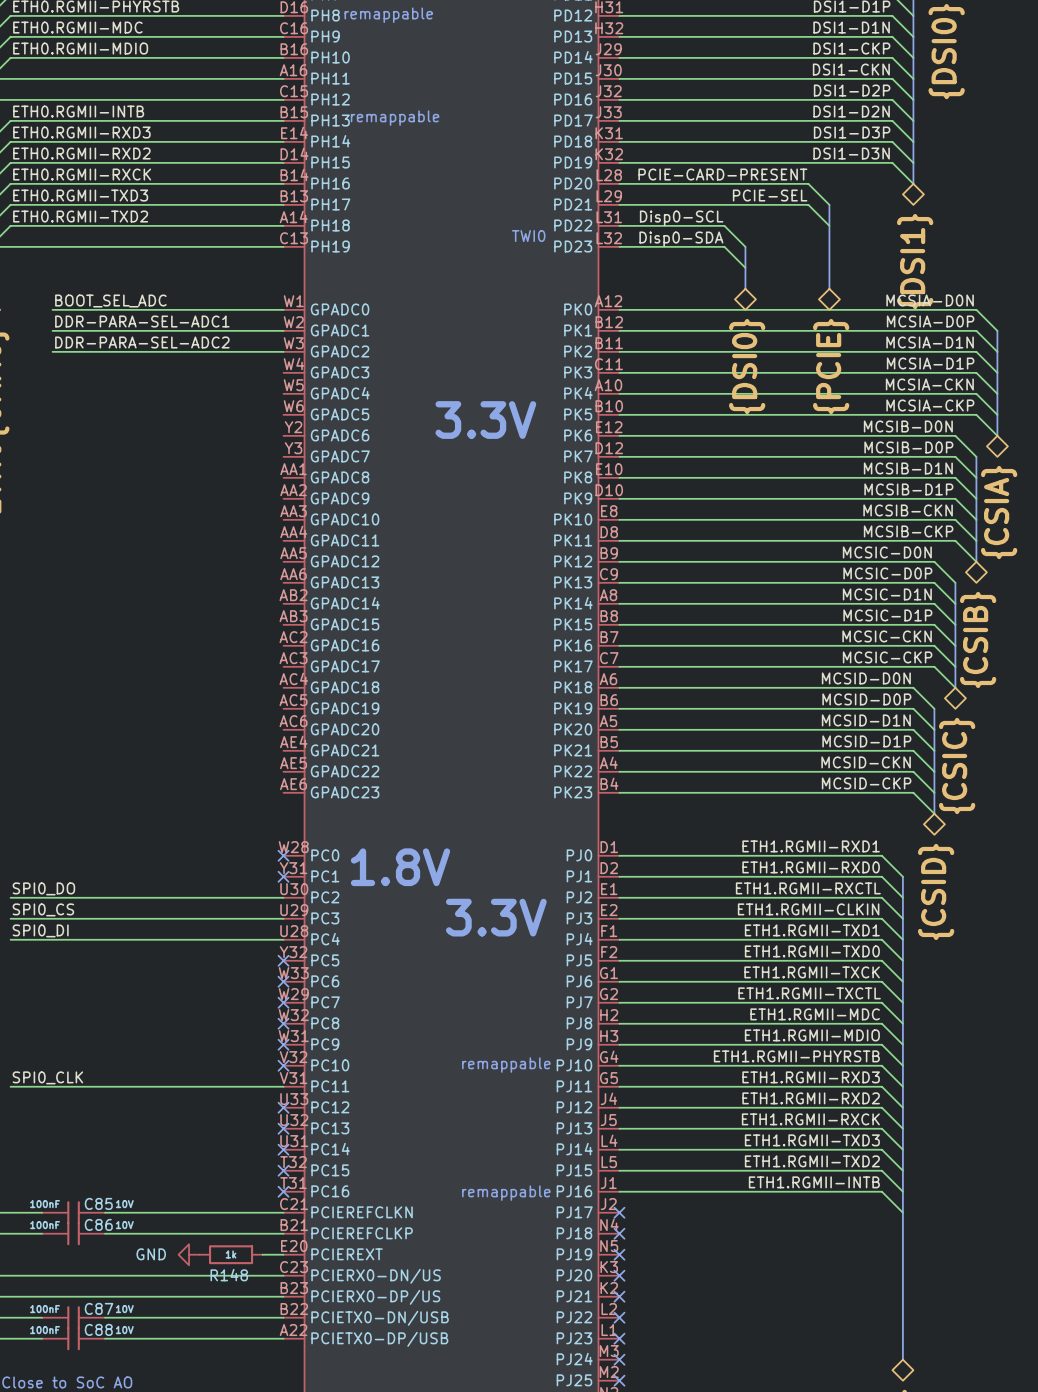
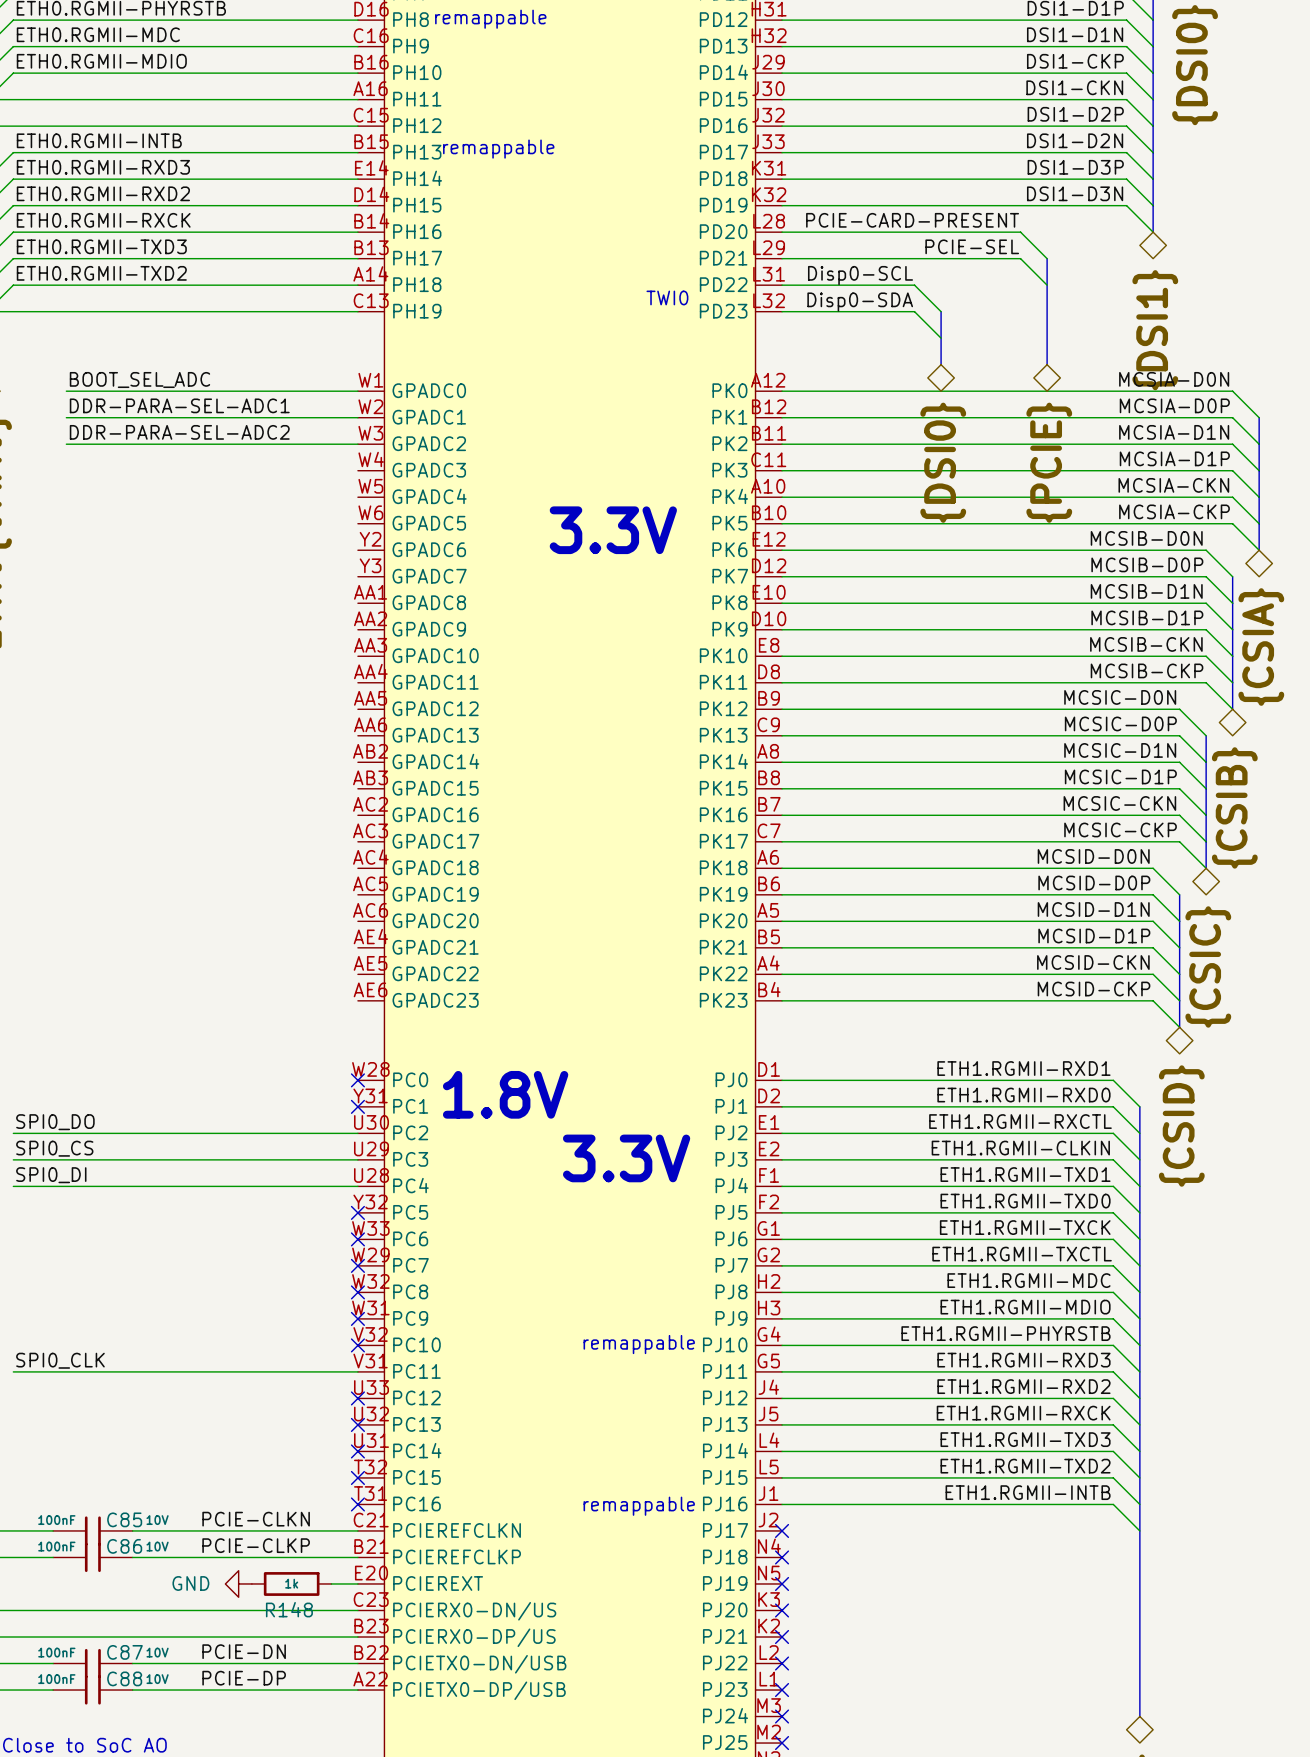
label: none -> PCIE-CLKN (256, 1519)
label: none -> PCIE-CLKP (256, 1545)
label: none -> PCIE-DN (244, 1651)
label: none -> PCIE-DP (244, 1678)

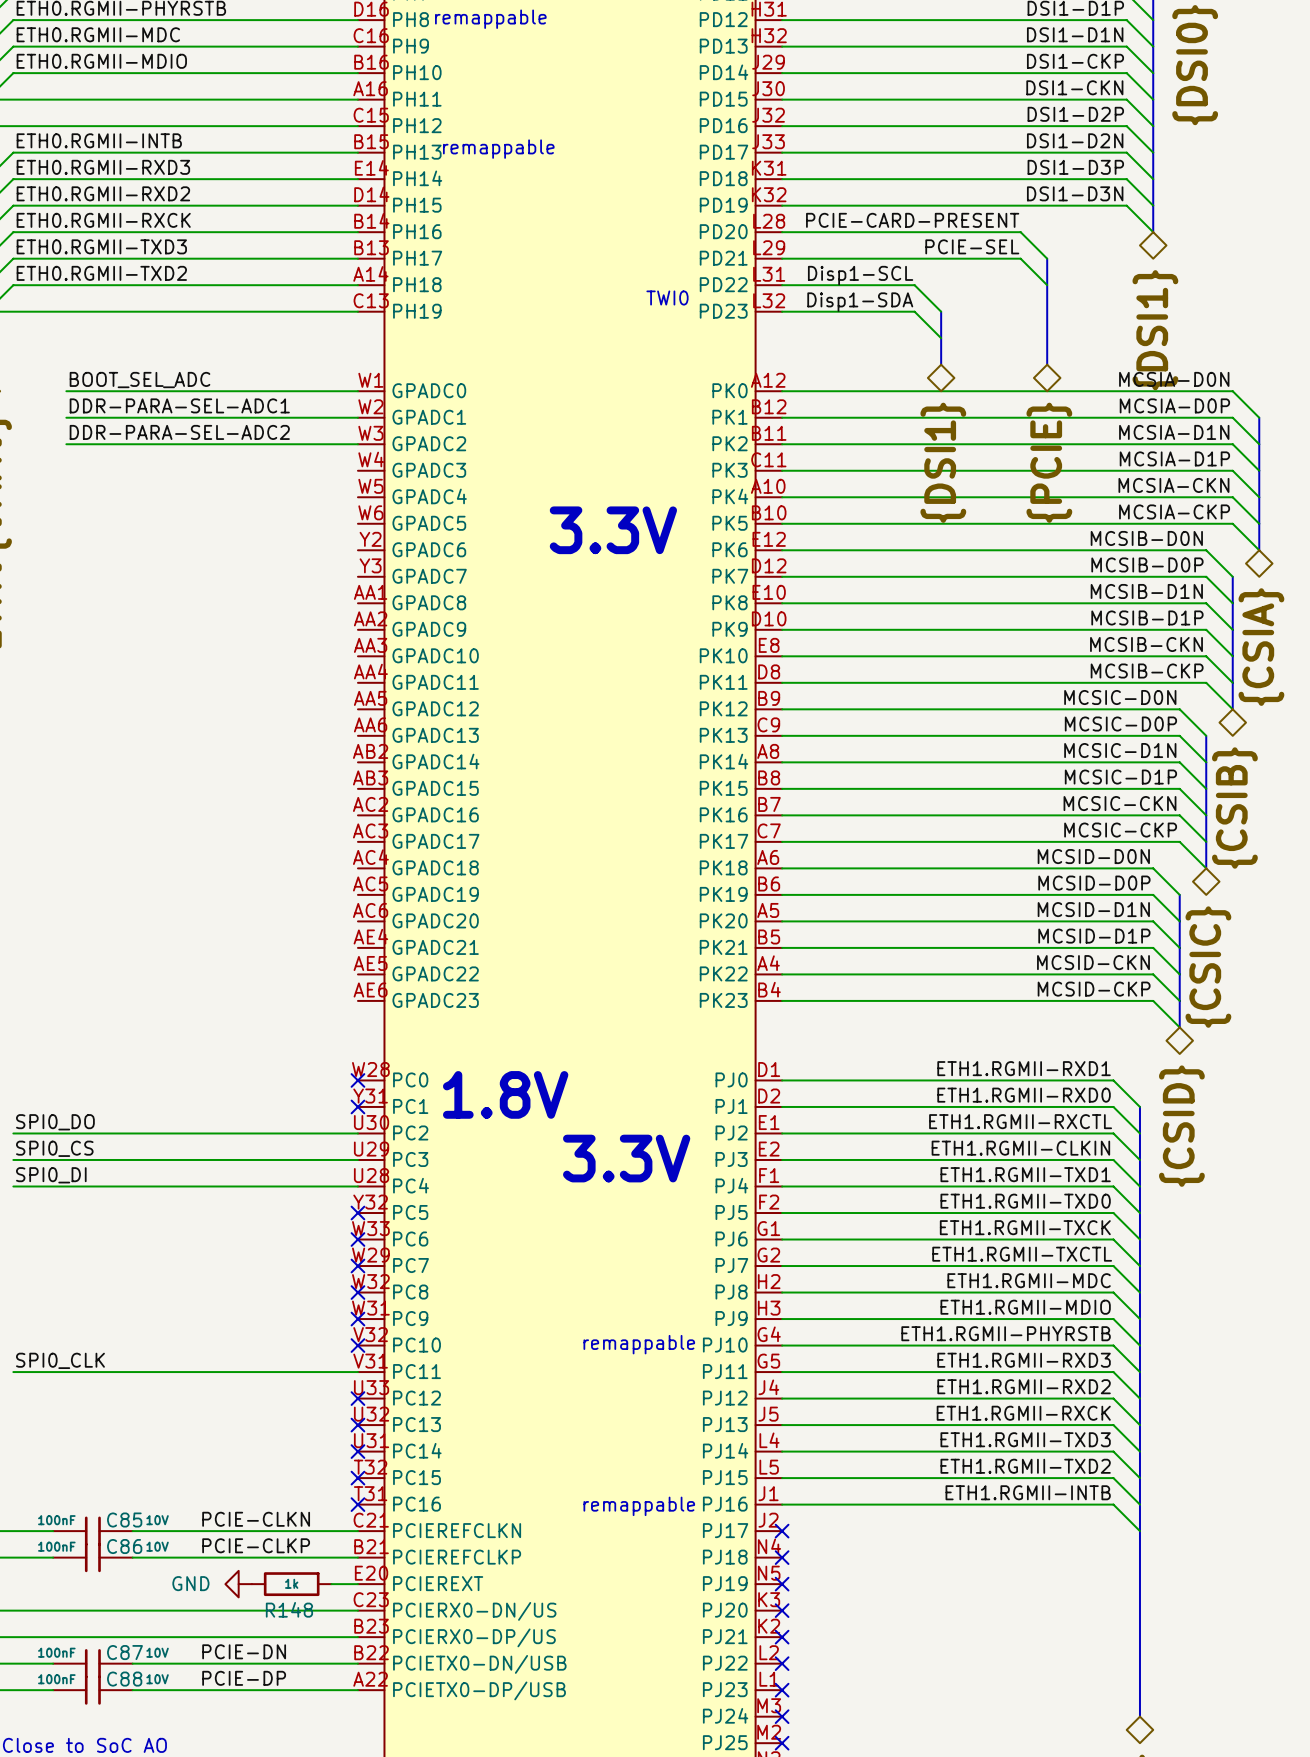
label: Disp0-SCL (860, 275) -> Disp1-SCL (860, 275)
label: Disp0-SDA (860, 302) -> Disp1-SDA (860, 302)
hierarchical label: {DSI0} (943, 462) -> {DSI1} (943, 462)

